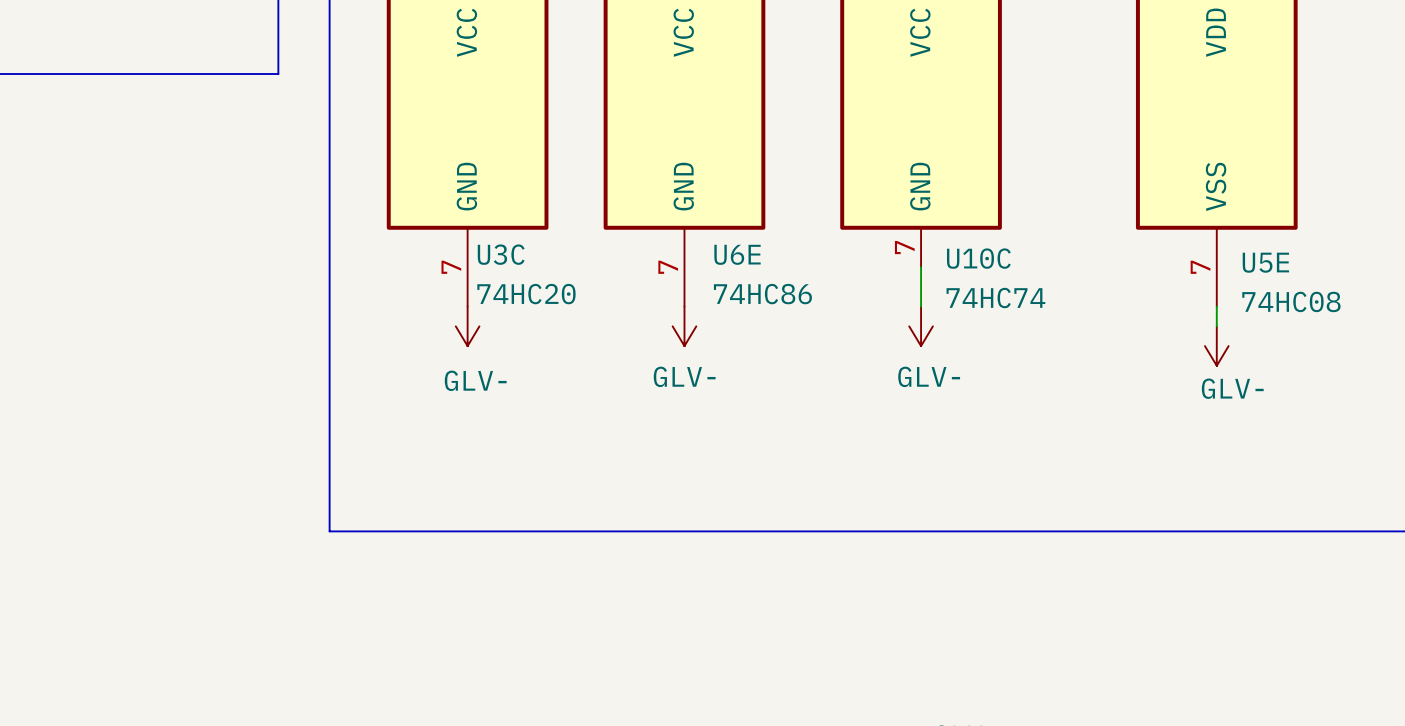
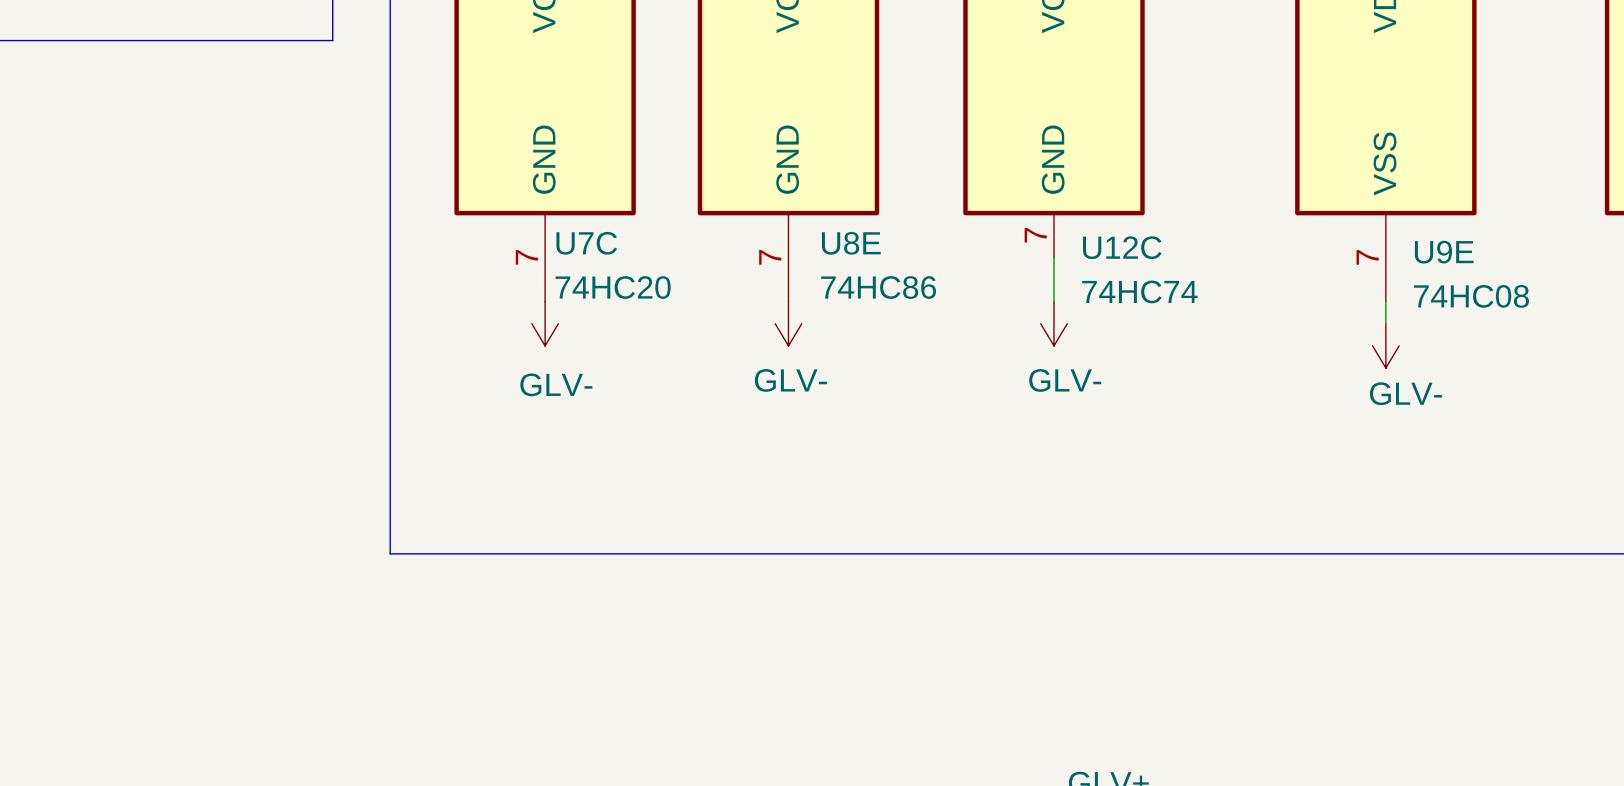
U3C name: U3C (501, 254) -> U7C (586, 243)
U6E name: U6E (737, 254) -> U8E (851, 243)
U10C name: U10C (978, 258) -> U12C (1122, 247)
U5E name: U5E (1265, 262) -> U9E (1444, 252)

